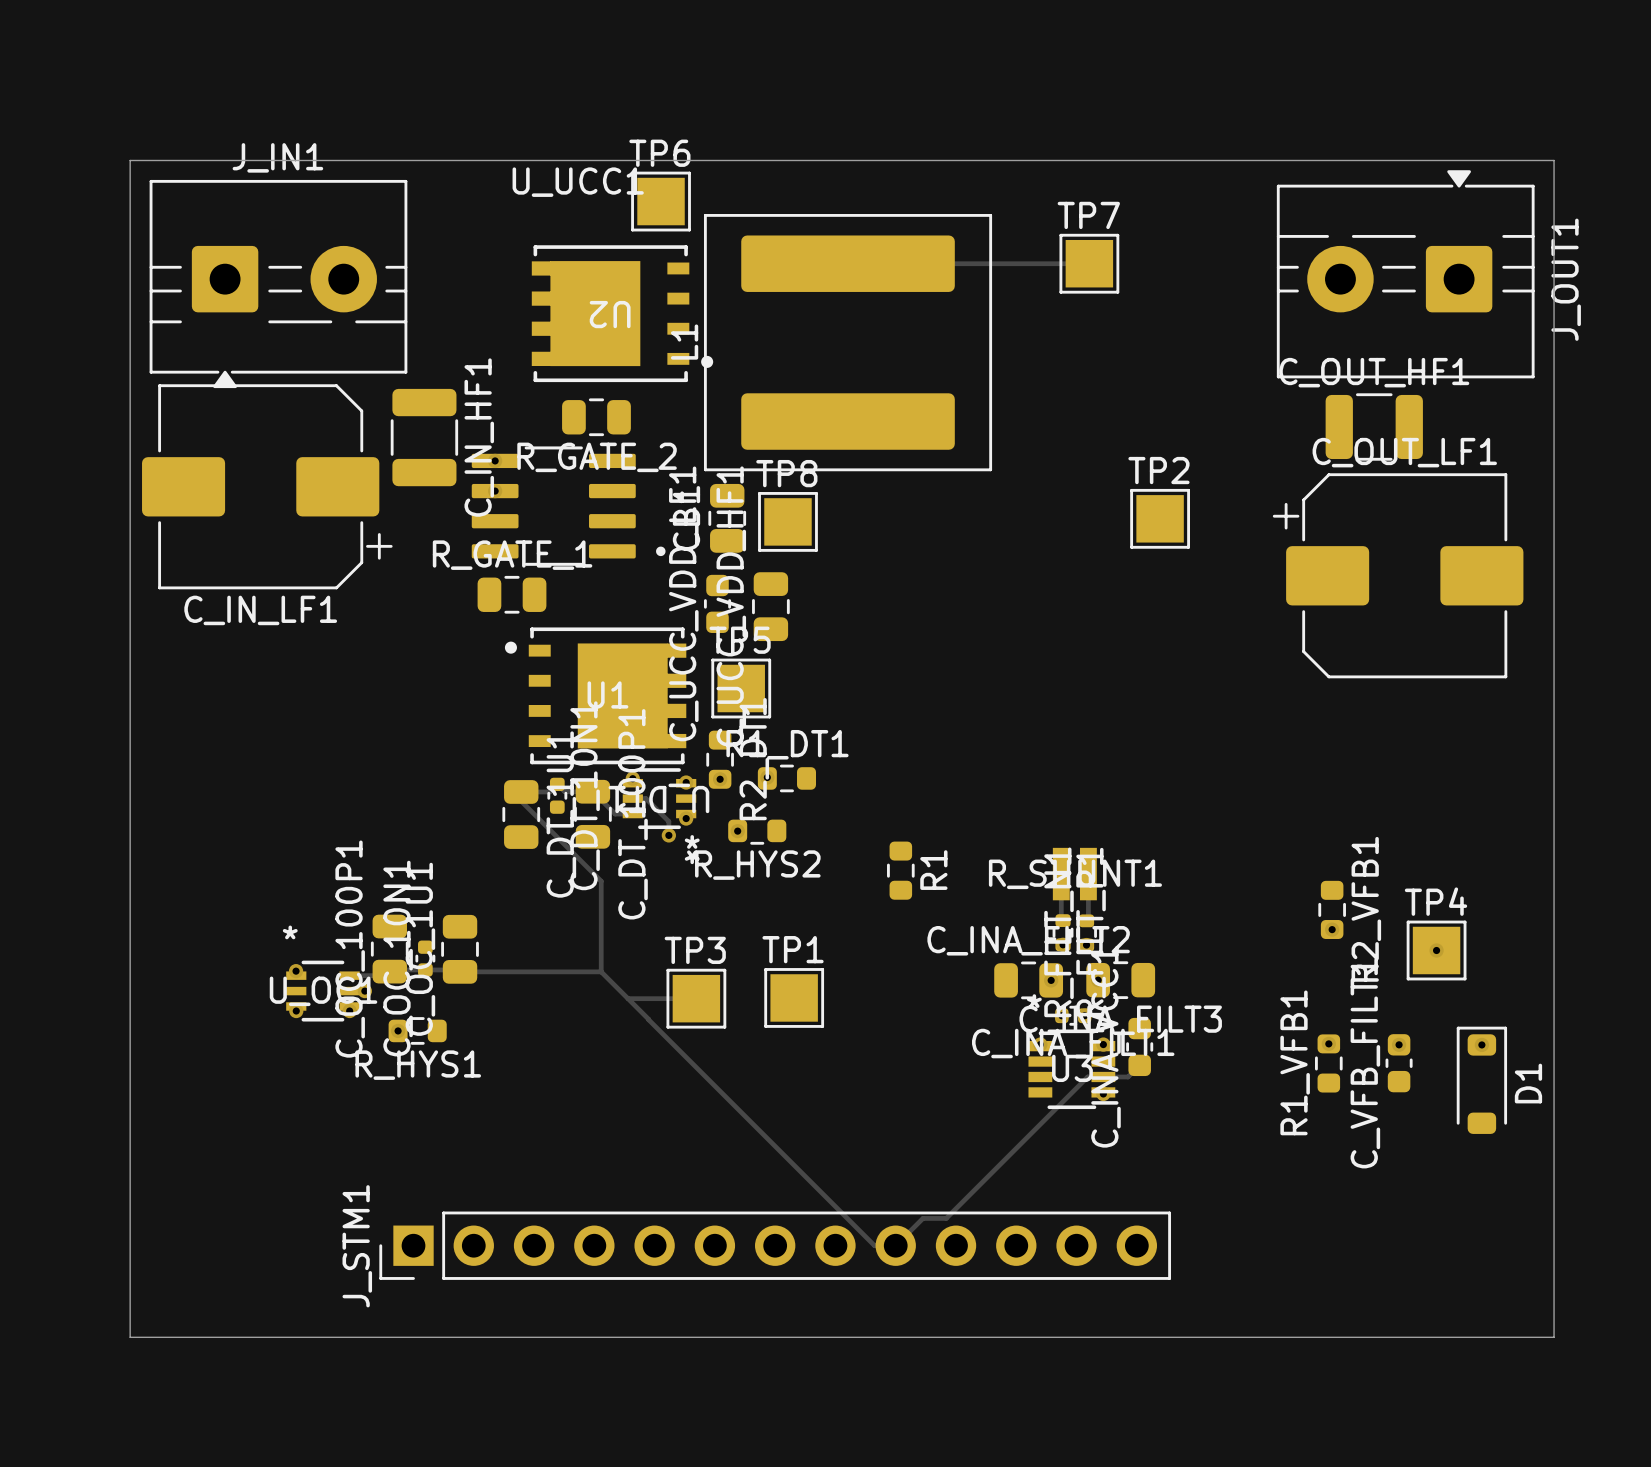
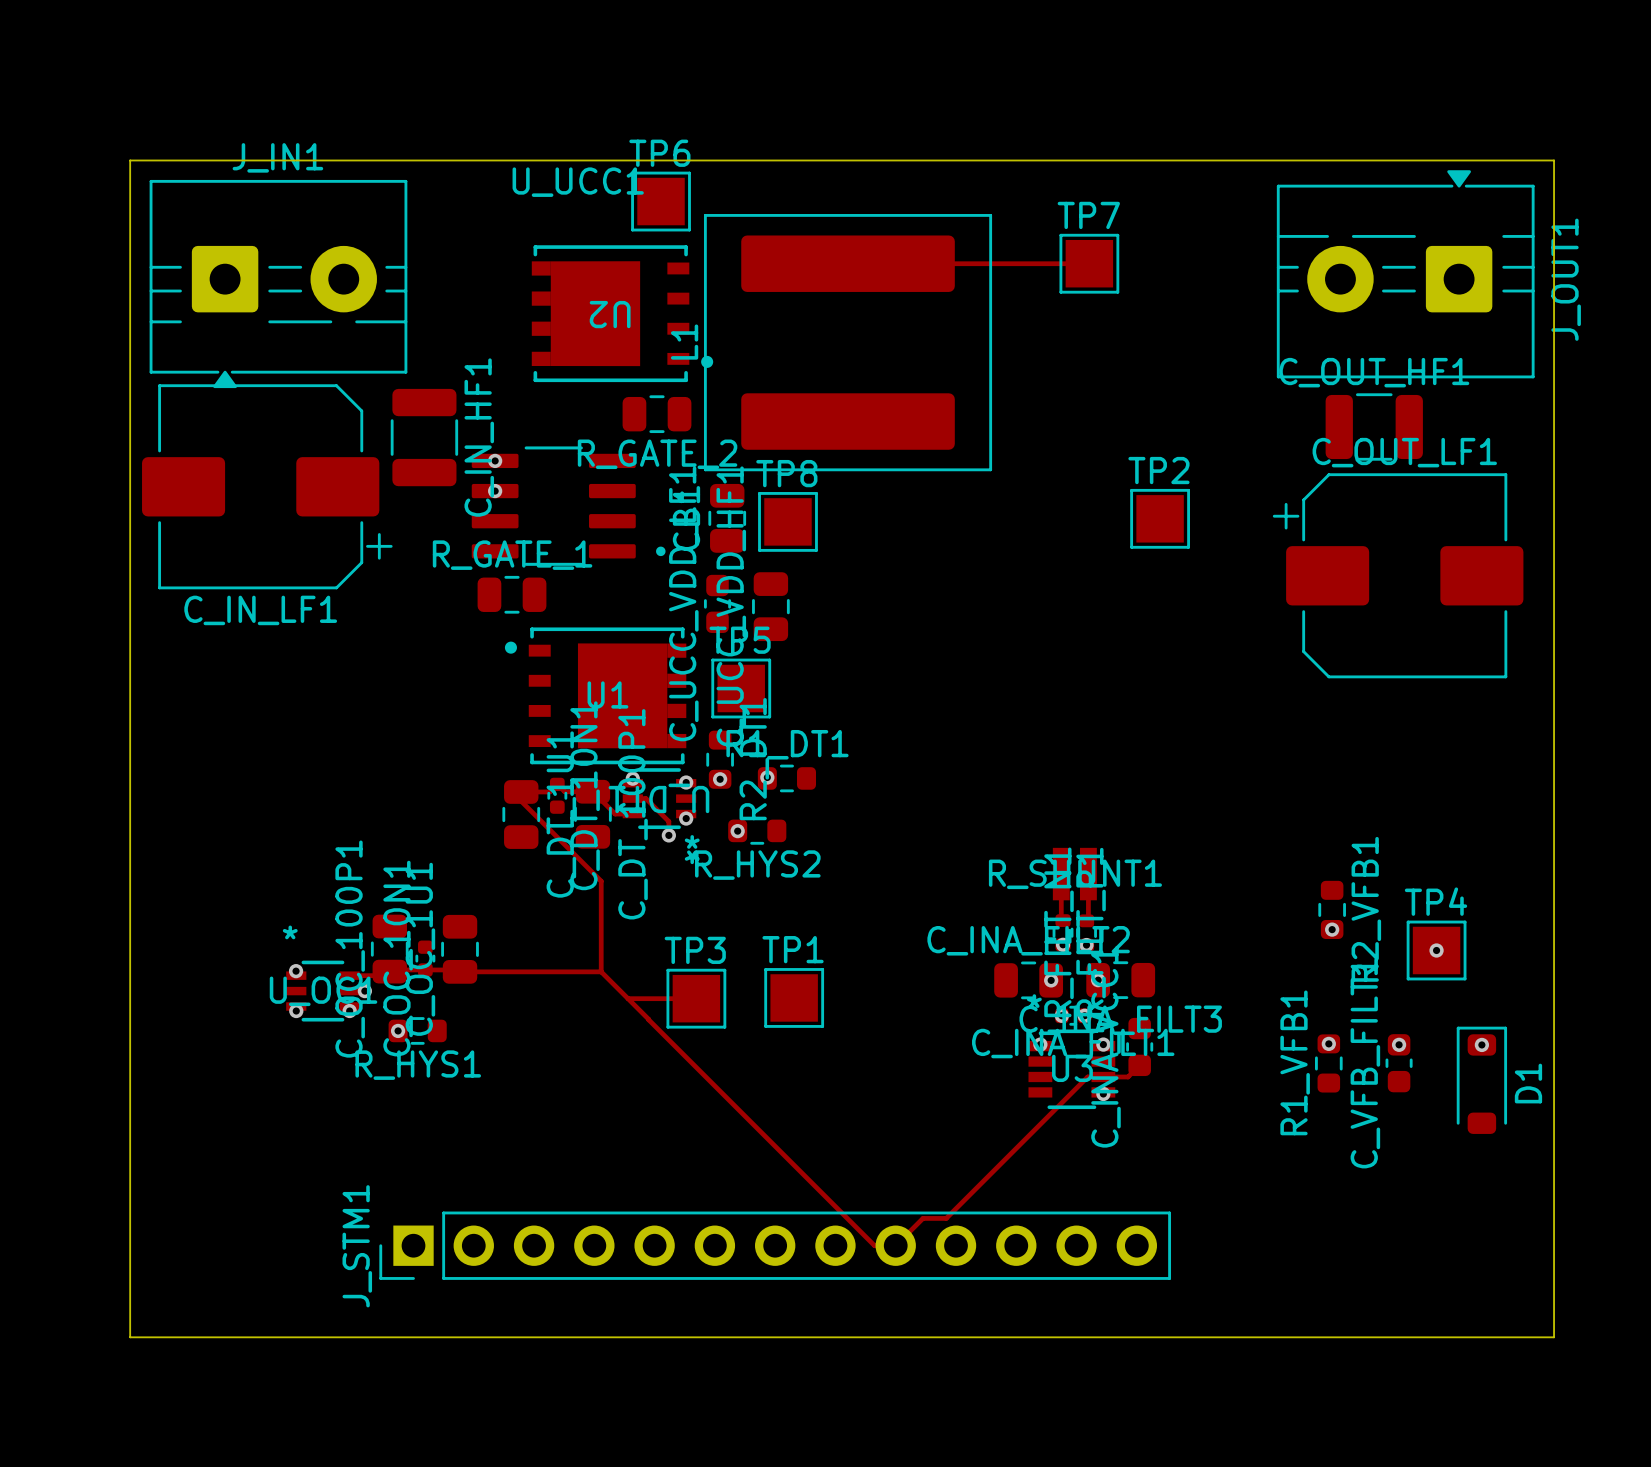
U2 footprint: [531, 245, 714, 383] -> [531, 245, 714, 383]
R_GATE_2 position: (596, 417) -> (656, 414)
U1 footprint: [504, 627, 687, 765] -> [504, 627, 687, 765]
R1: (900, 870) -> none

